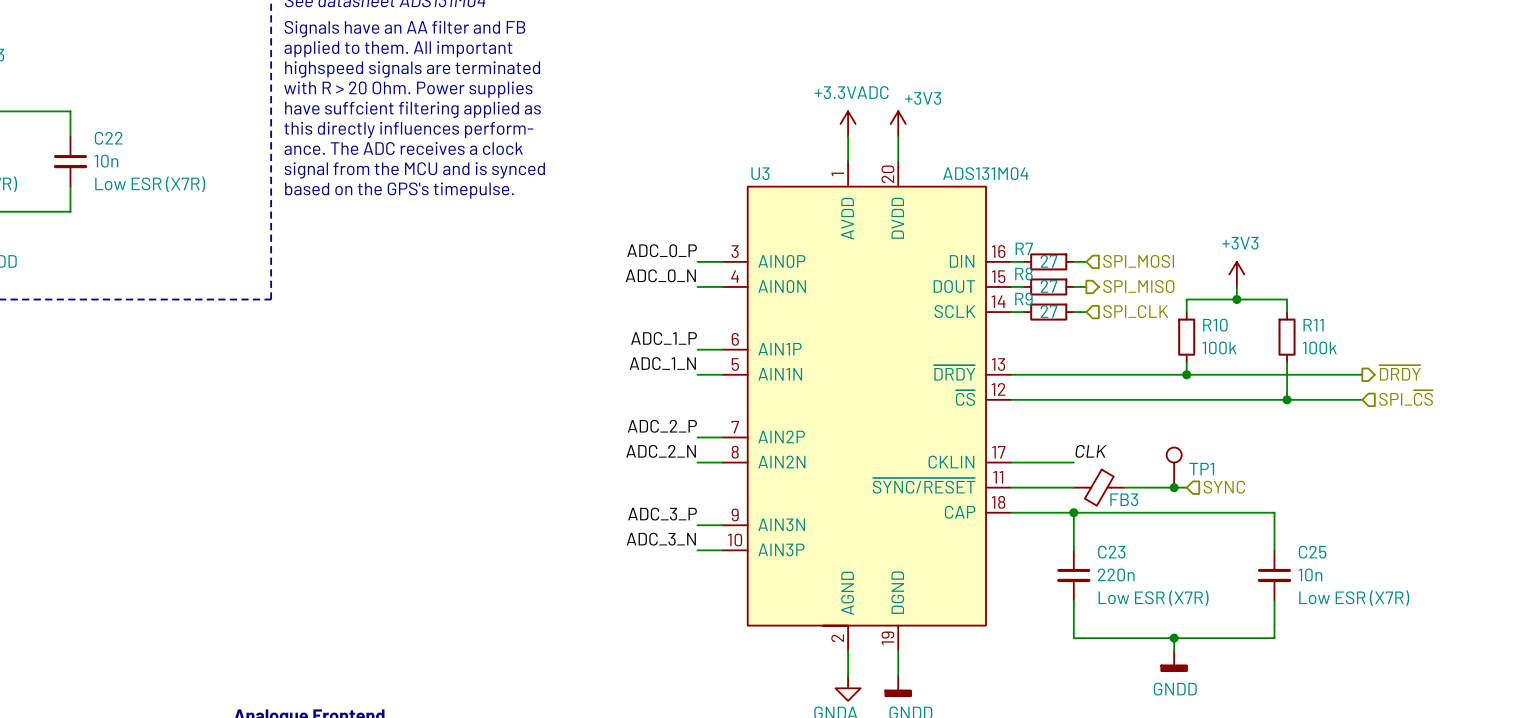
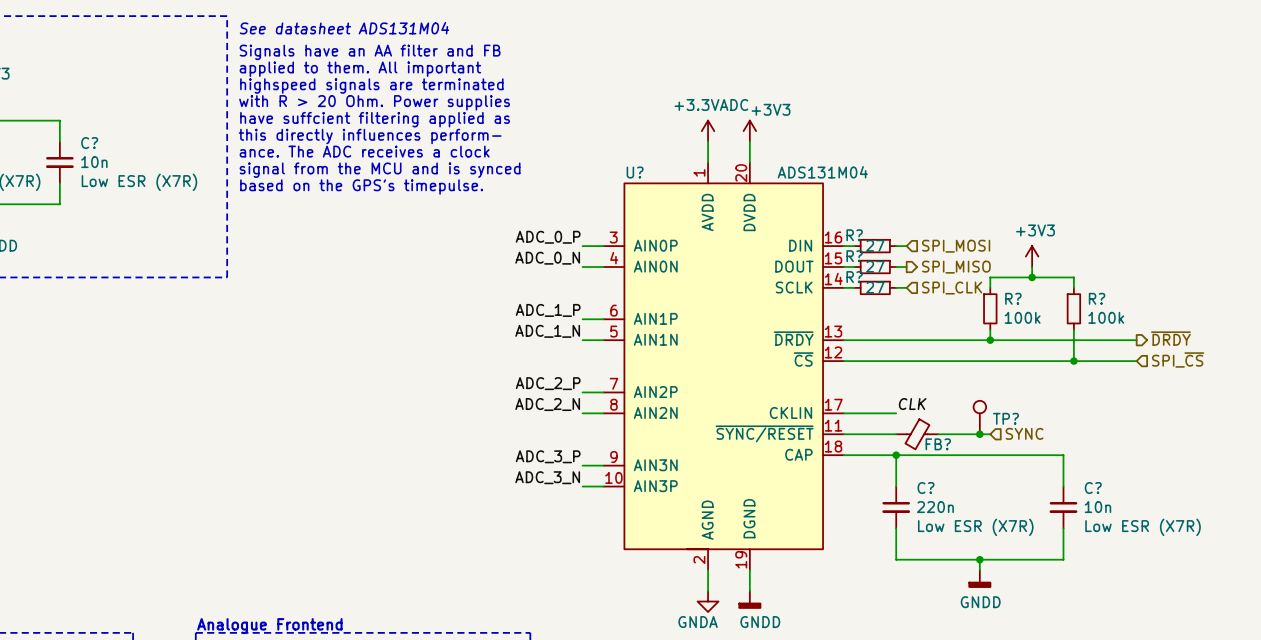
C22 name: C22 (108, 138) -> C? (89, 143)
U3 name: U3 (760, 173) -> U? (635, 172)
R7 name: R7 (1024, 248) -> R? (854, 235)
R8 name: R8 (1023, 273) -> R? (854, 256)
R9 name: R9 (1023, 299) -> R? (854, 277)
R10 name: R10 (1215, 325) -> R? (1013, 298)
R11 name: R11 (1313, 325) -> R? (1097, 298)
TP1 name: TP1 (1201, 469) -> TP? (1005, 418)
FB3 name: FB3 (1124, 499) -> FB? (938, 444)
C23 name: C23 (1111, 552) -> C? (925, 488)
C25 name: C25 (1312, 552) -> C? (1093, 488)

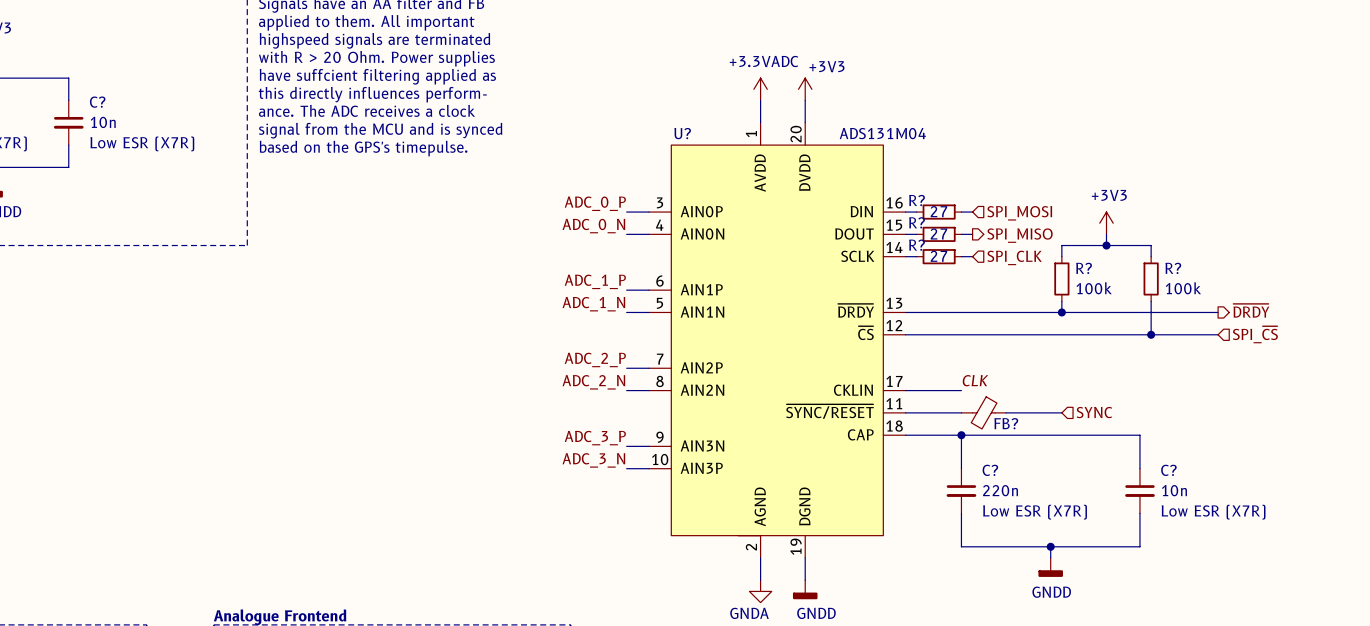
TP?: (979, 417) -> none
junction: (979, 434) -> none

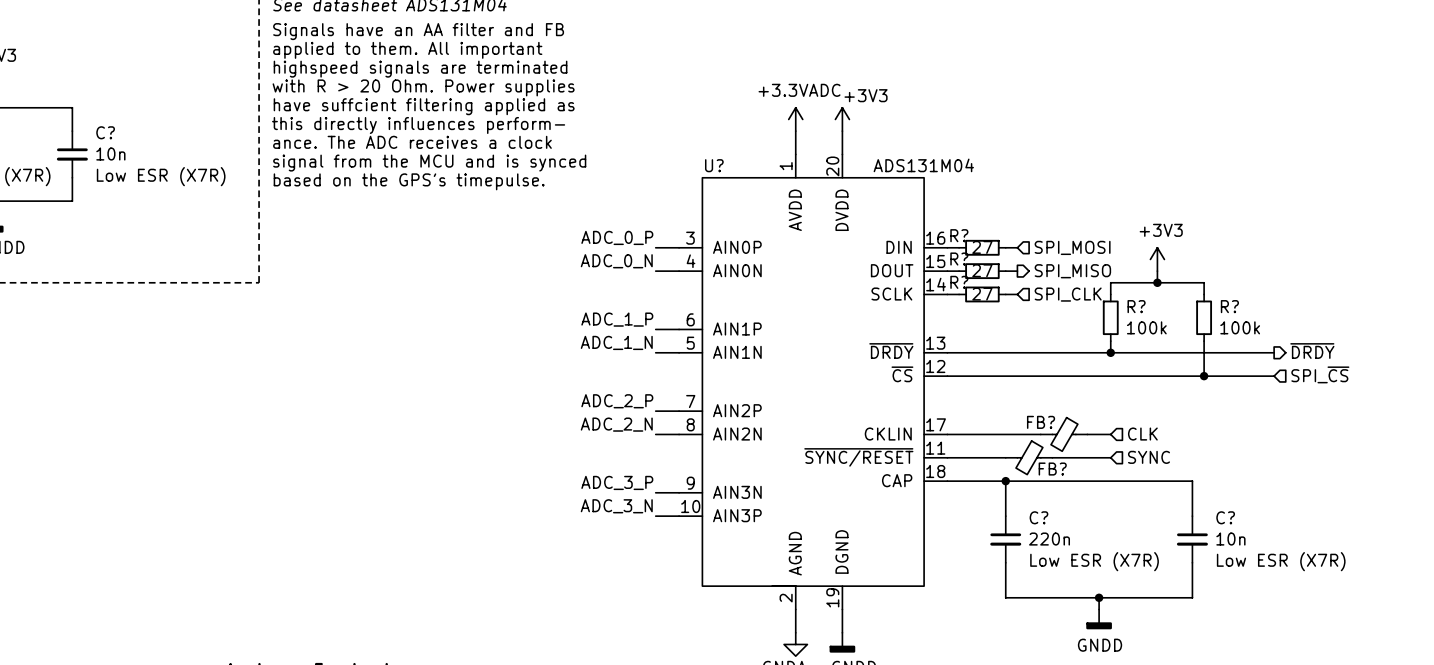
label: CLK (975, 380) -> none
wire: none -> (1005, 434) (1040, 434)
FB?: none -> (1064, 434)
wire: none -> (1087, 434) (1110, 434)
hierarchical label: none -> CLK (1142, 434)

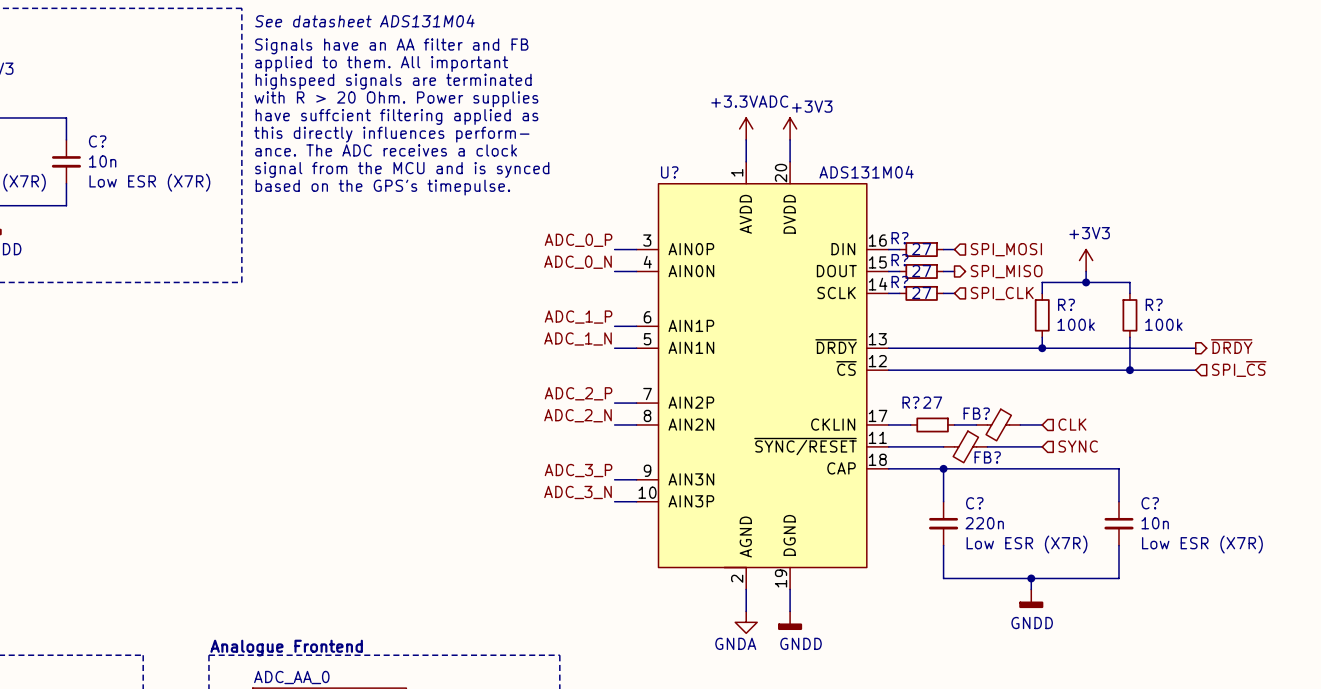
wire: (970, 434) (1017, 434) -> none
R?: none -> 27 (932, 424)

